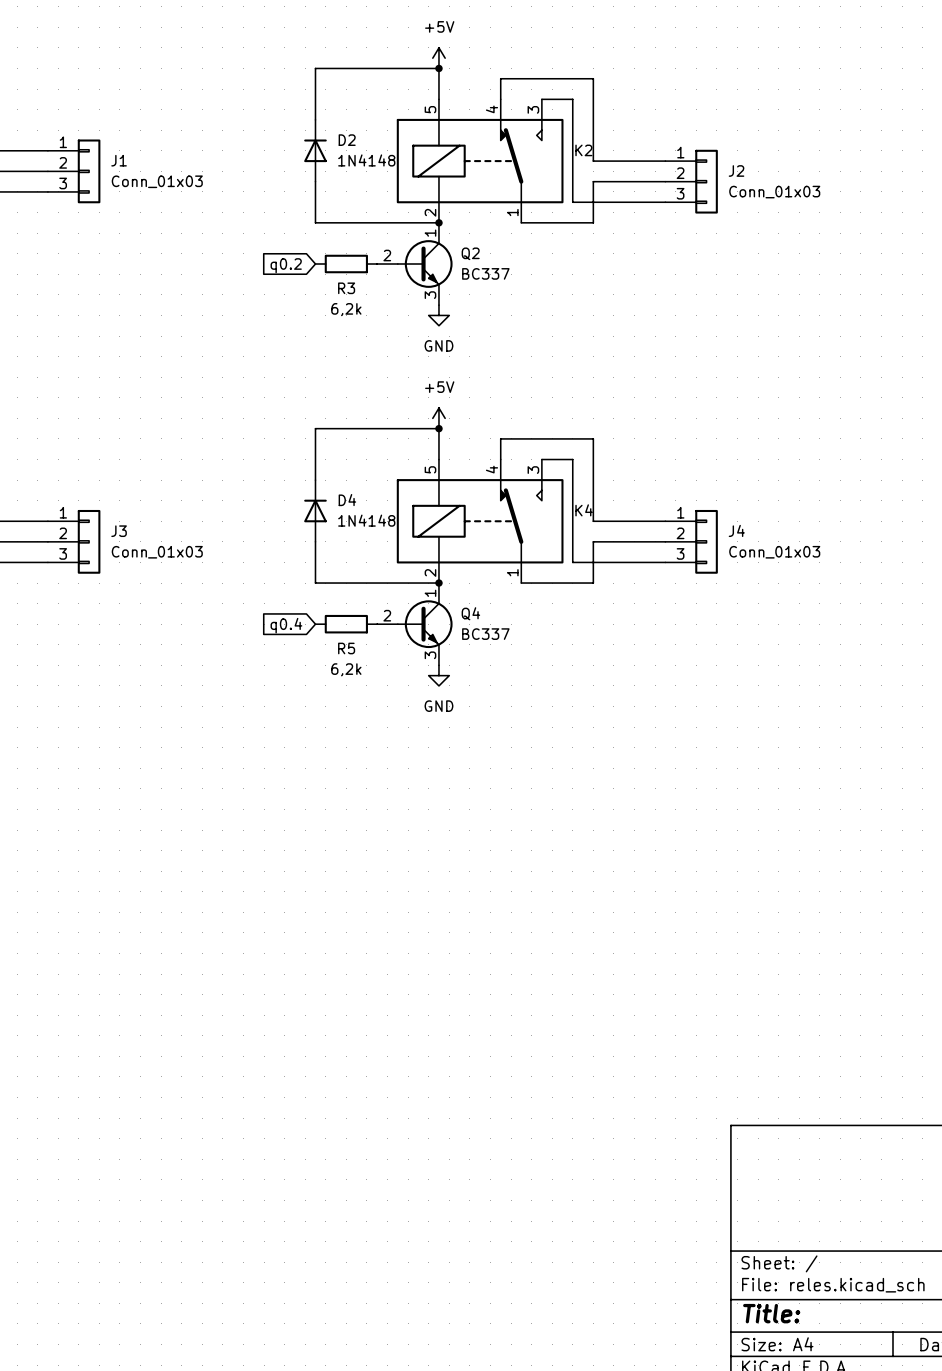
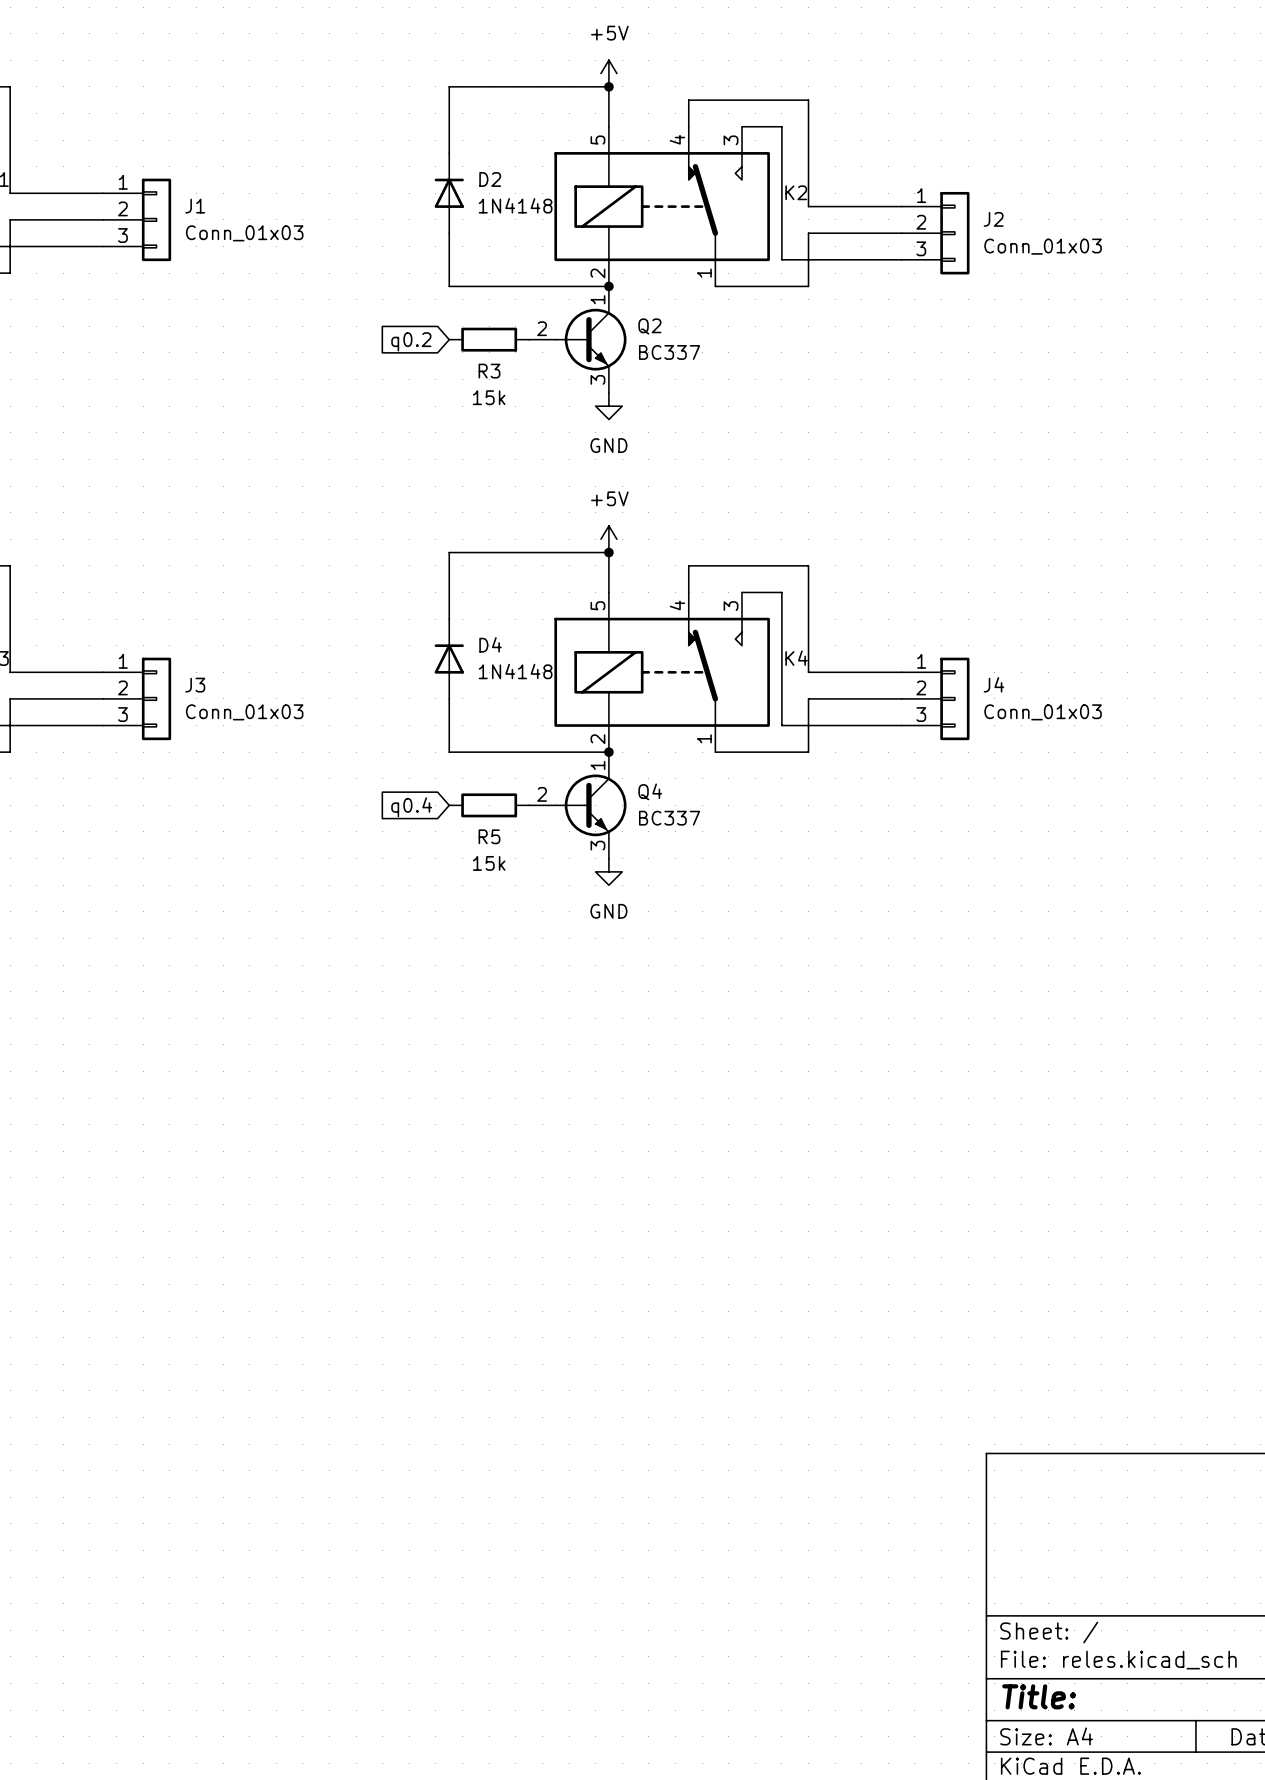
R3 value: 6,2k (346, 309) -> 15k (489, 397)
R5 value: 6,2k (346, 669) -> 15k (489, 863)

